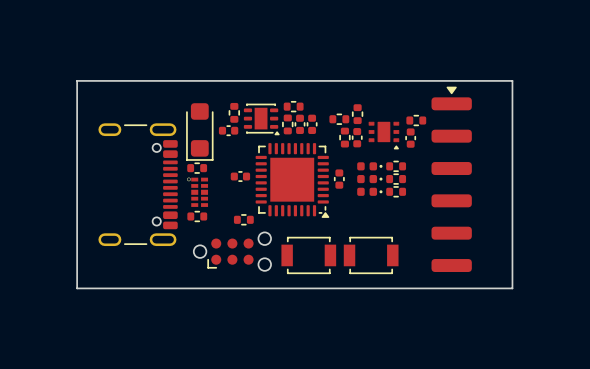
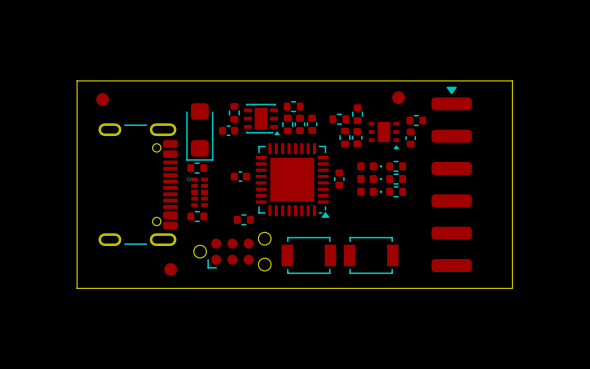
part: none -> (398, 97)
part: none -> (102, 99)
part: none -> (170, 269)

